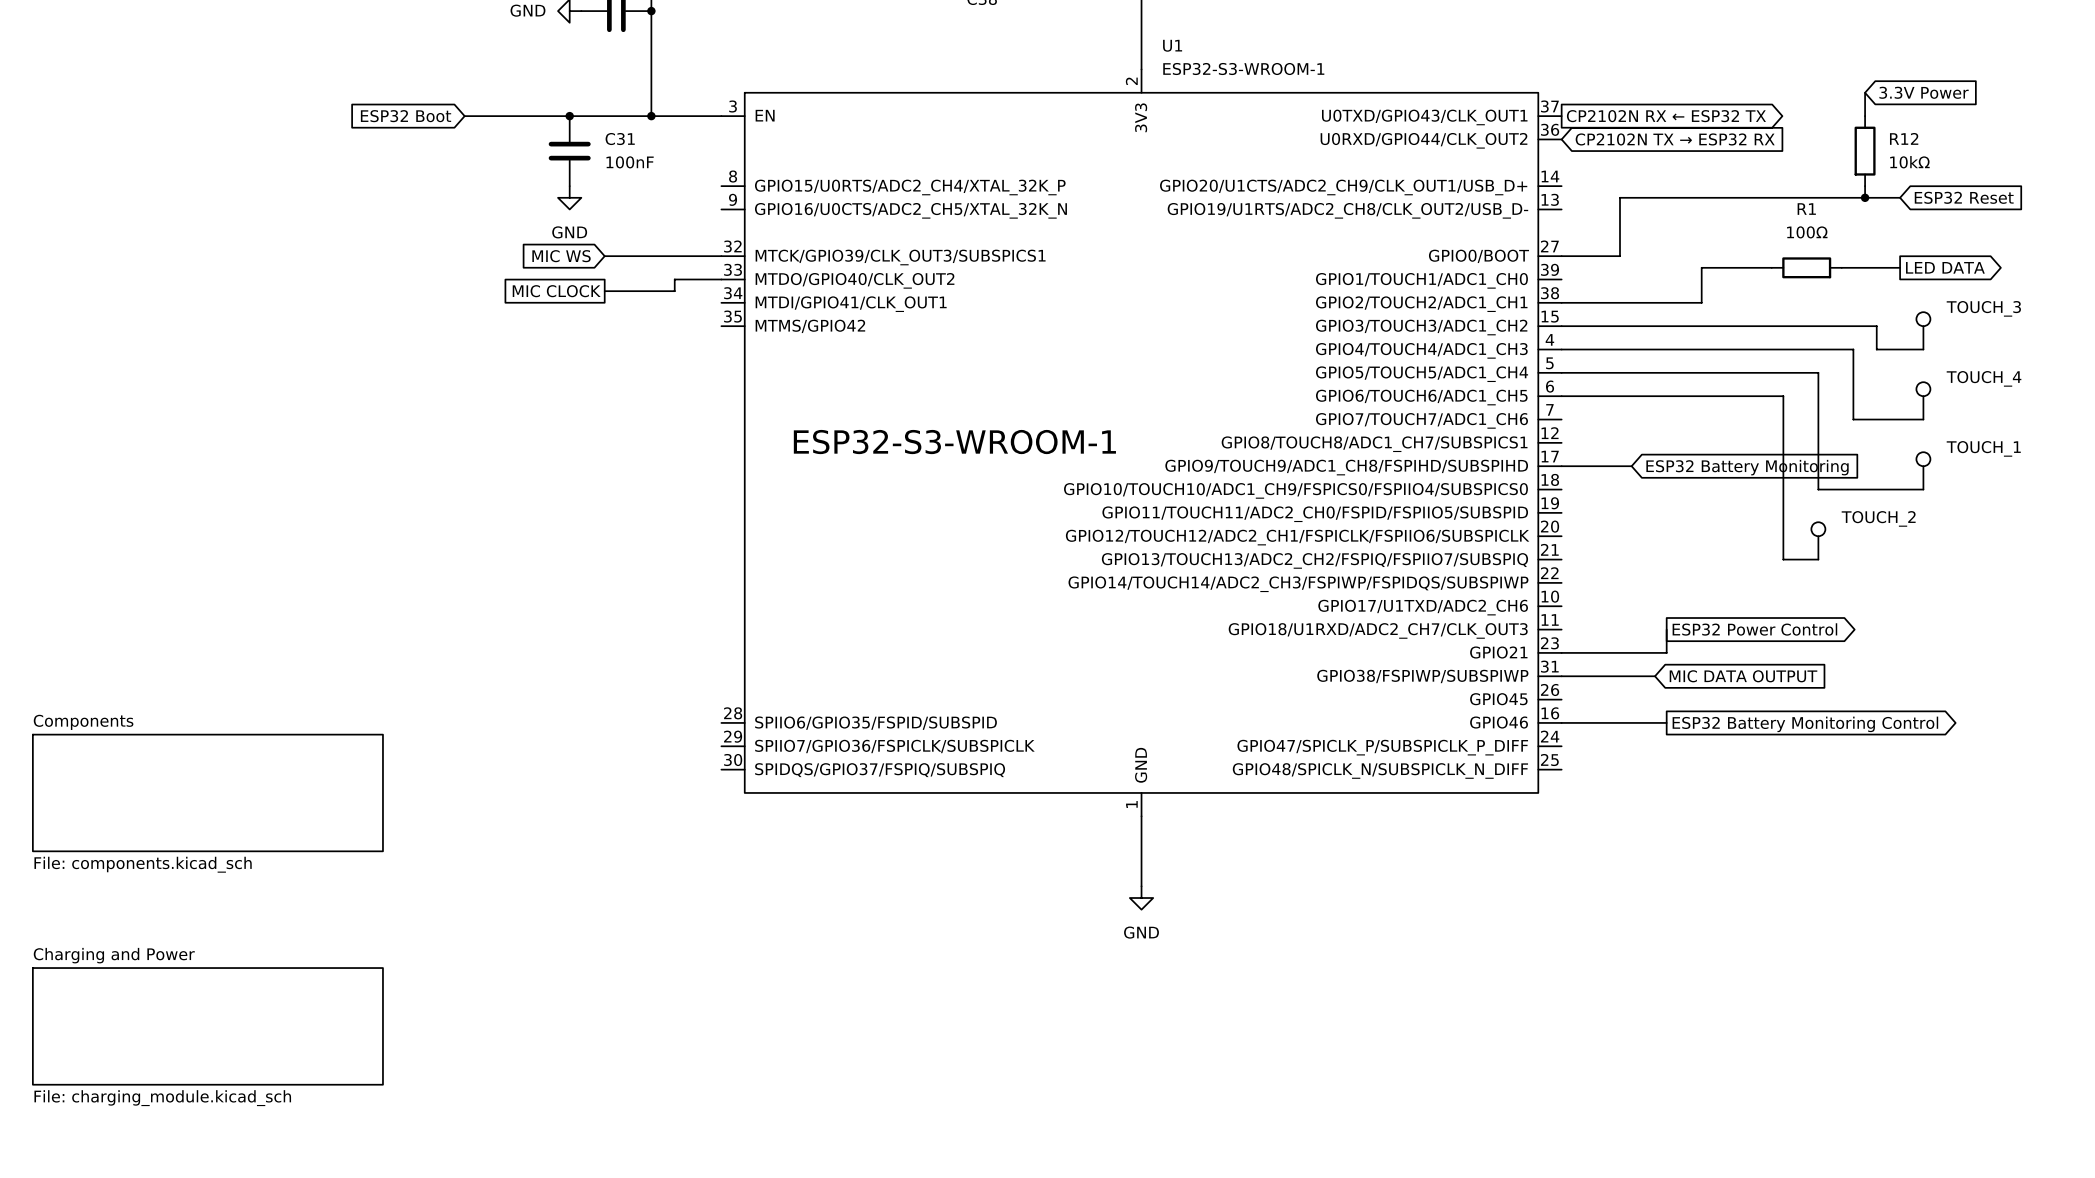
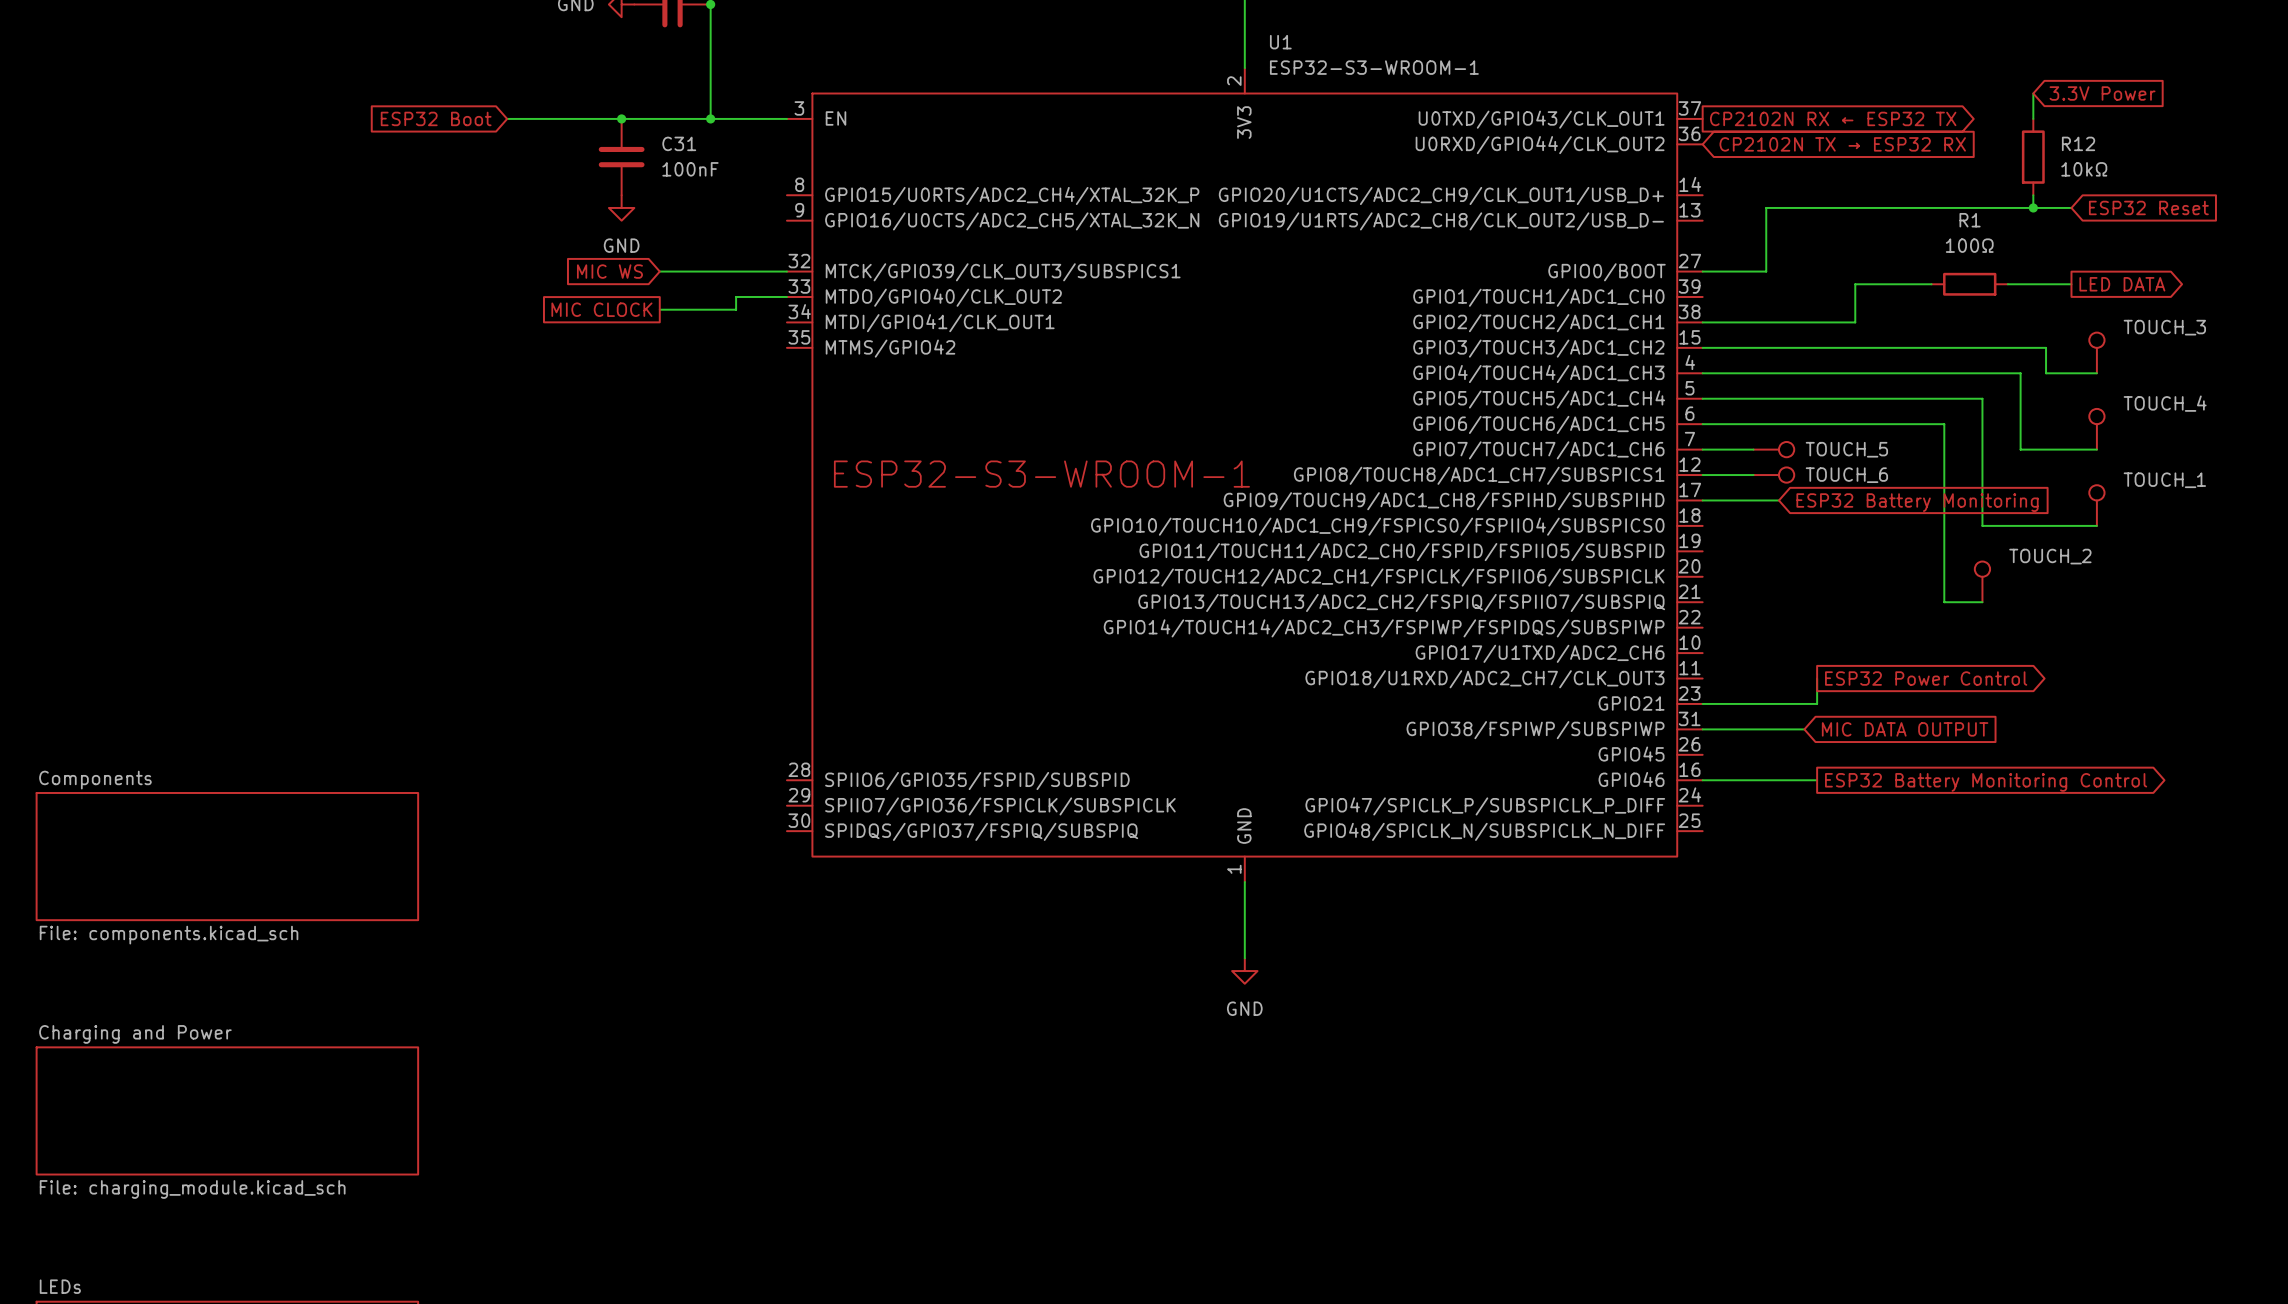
wire: none -> (1702, 449) (1753, 449)
TOUCH_5: none -> (1773, 449)
wire: none -> (1702, 475) (1753, 475)
TOUCH_6: none -> (1773, 475)

